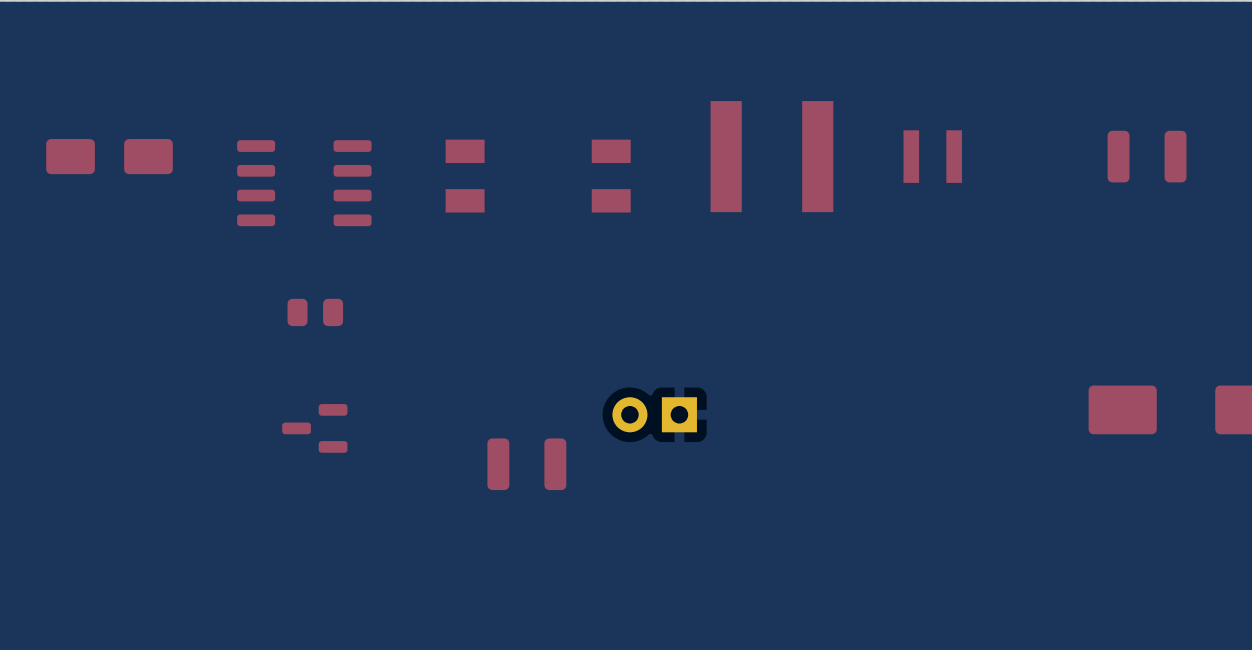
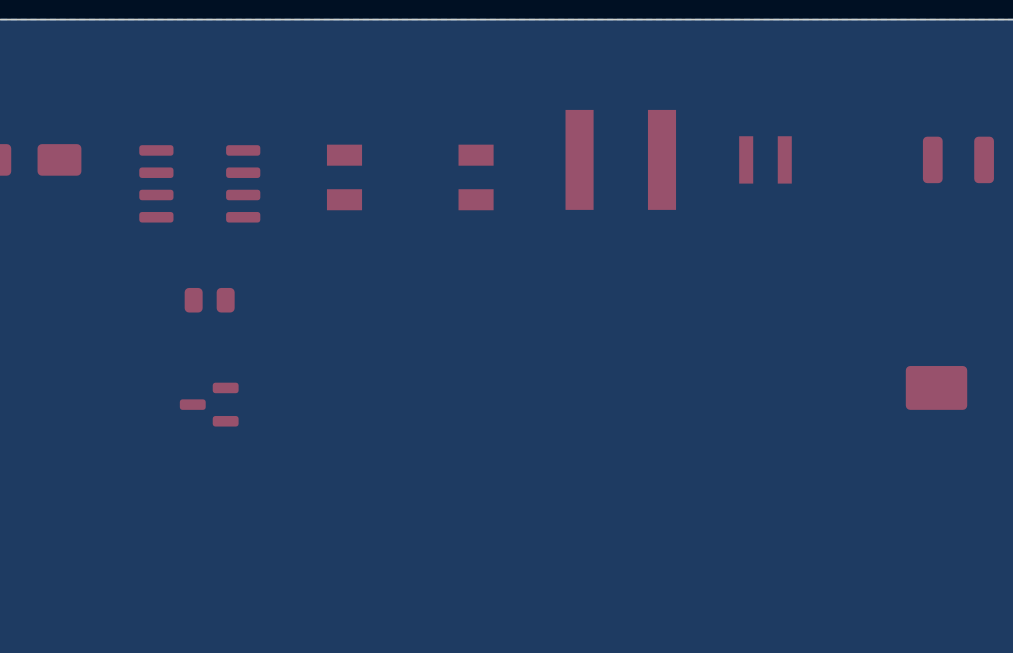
part: (654, 414) -> none
part: (526, 464) -> none

